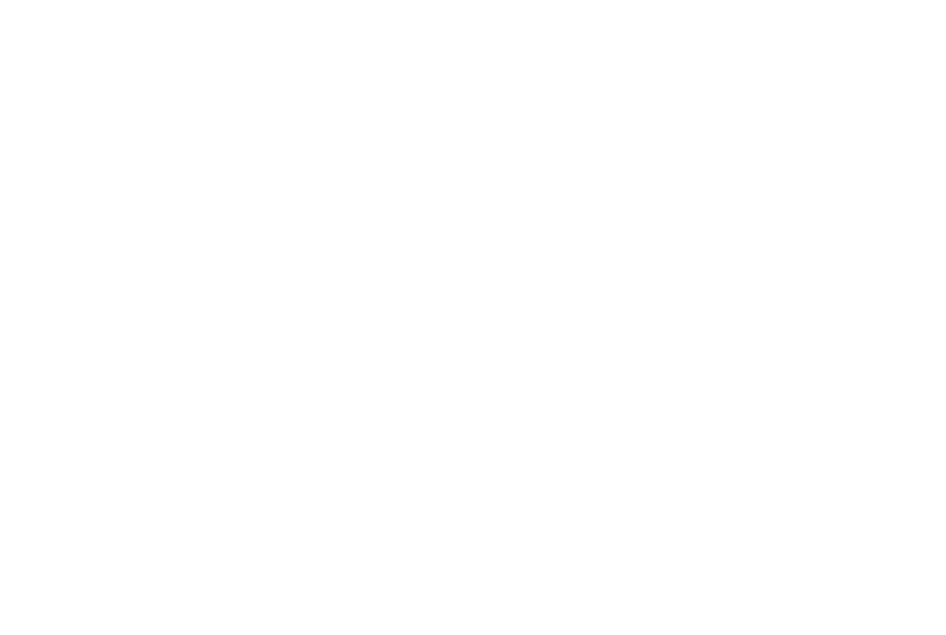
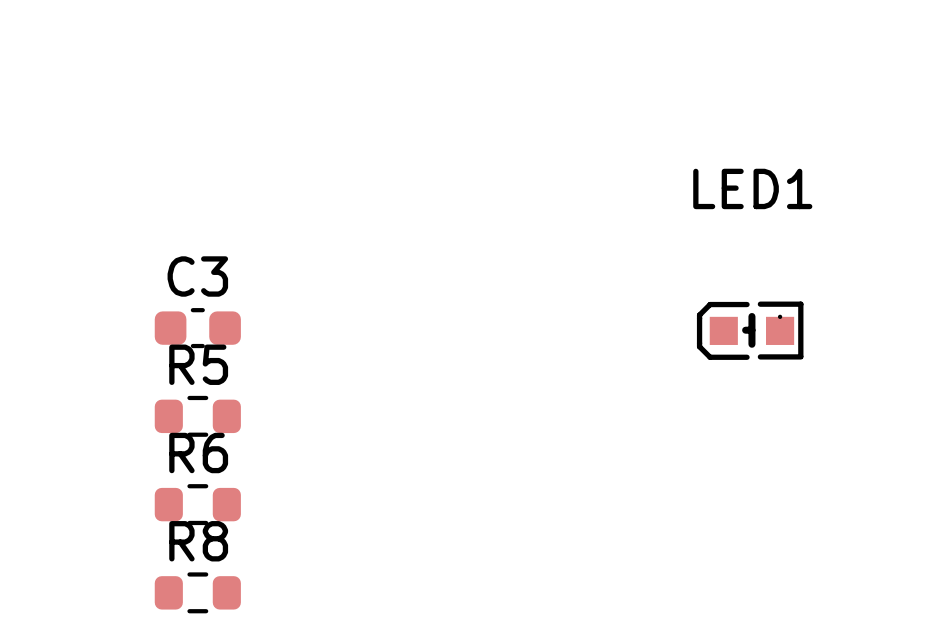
C3: none -> (197, 328)
LED1: none -> (750, 330)
R5: none -> (197, 416)
R6: none -> (197, 504)
R8: none -> (197, 592)

